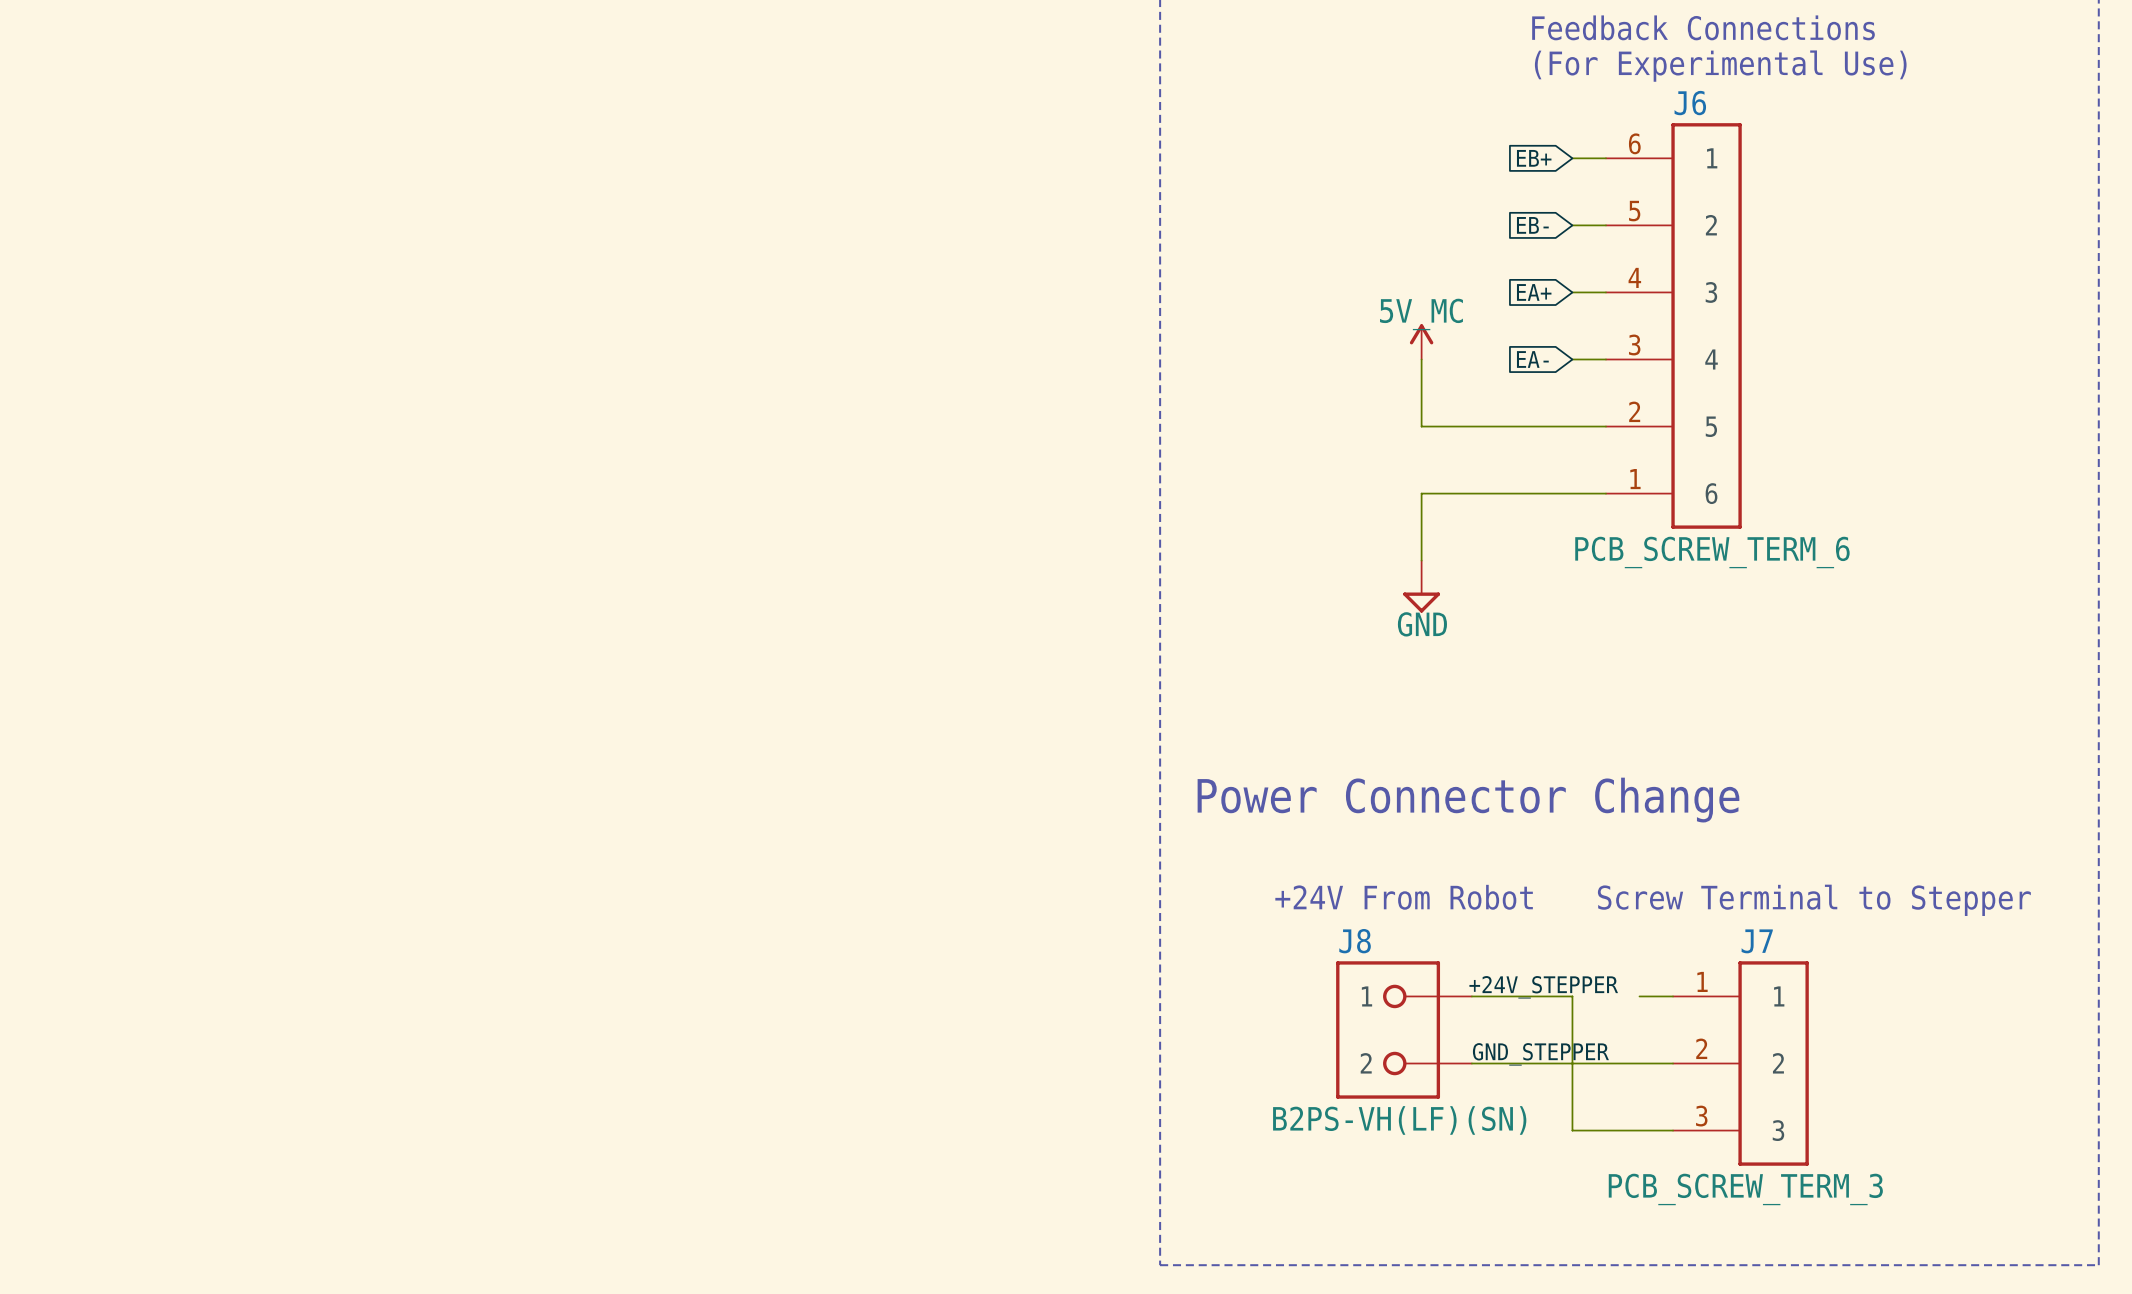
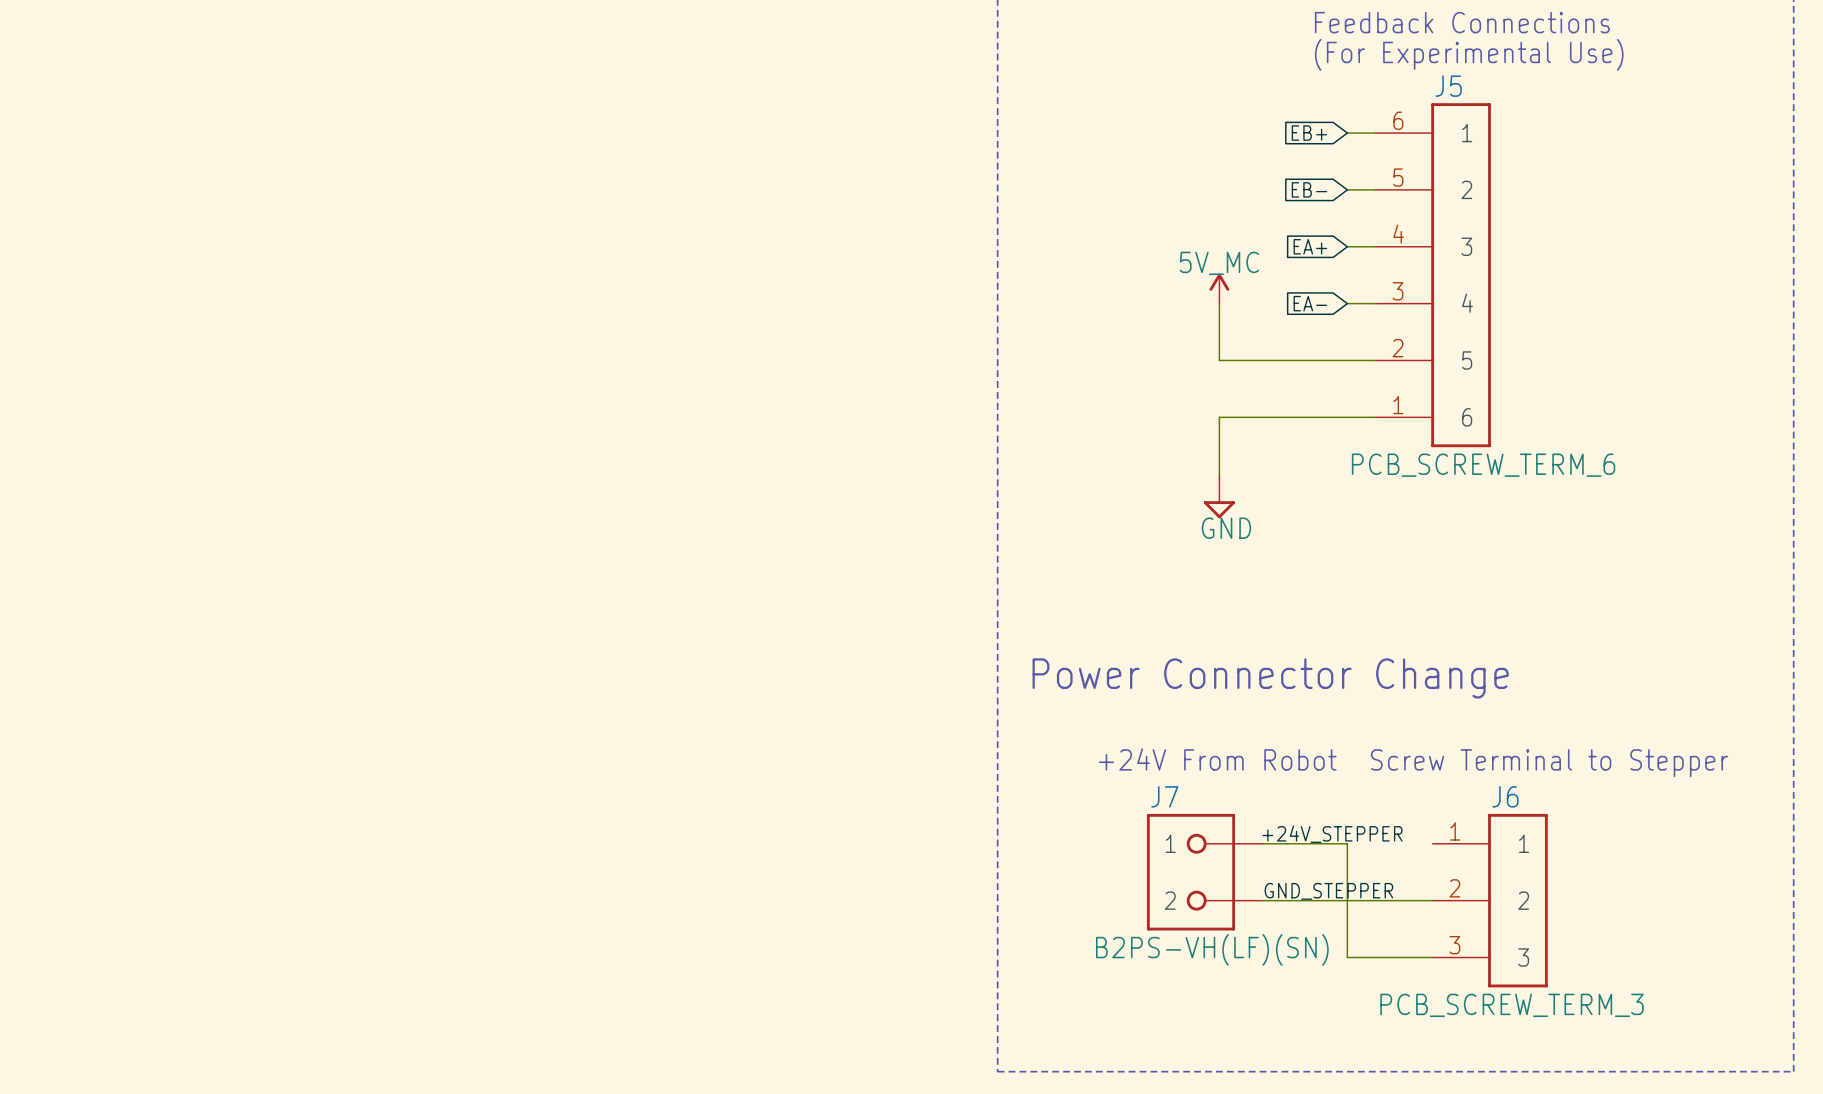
J6 name: J6 (1690, 103) -> J5 (1448, 86)
J8 name: J8 (1355, 941) -> J7 (1164, 796)
J7 name: J7 (1757, 941) -> J6 (1505, 796)
wire: (1639, 996) (1673, 996) -> none

